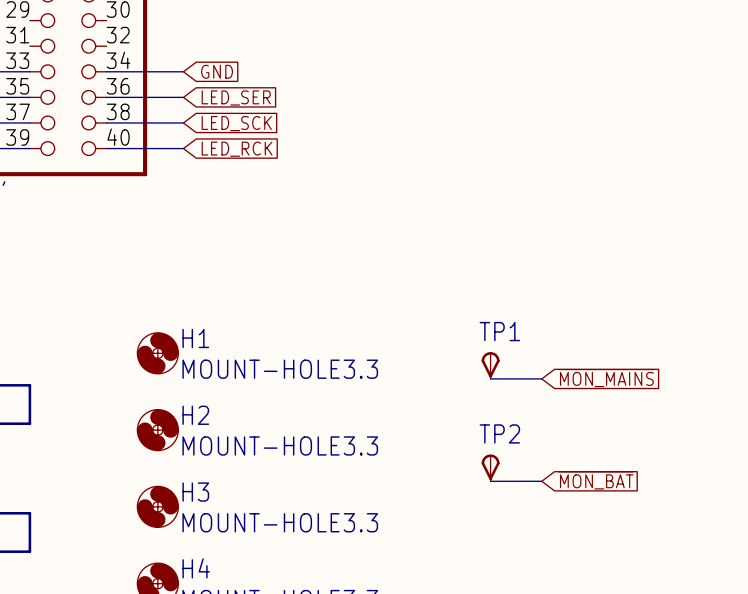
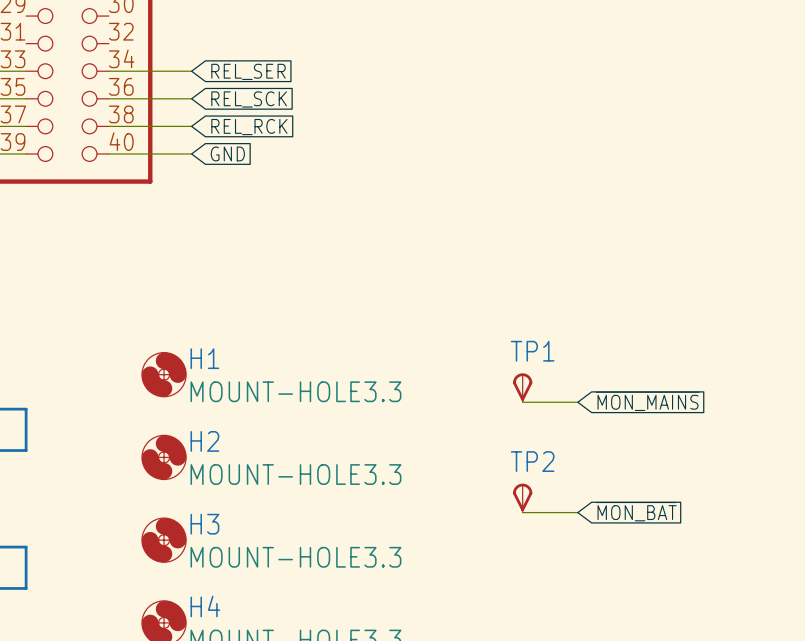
global label: GND (217, 71) -> REL_SER (248, 71)
global label: LED_SER (236, 97) -> REL_SCK (249, 99)
global label: LED_SCK (236, 123) -> REL_RCK (249, 127)
global label: LED_RCK (237, 149) -> GND (227, 153)

